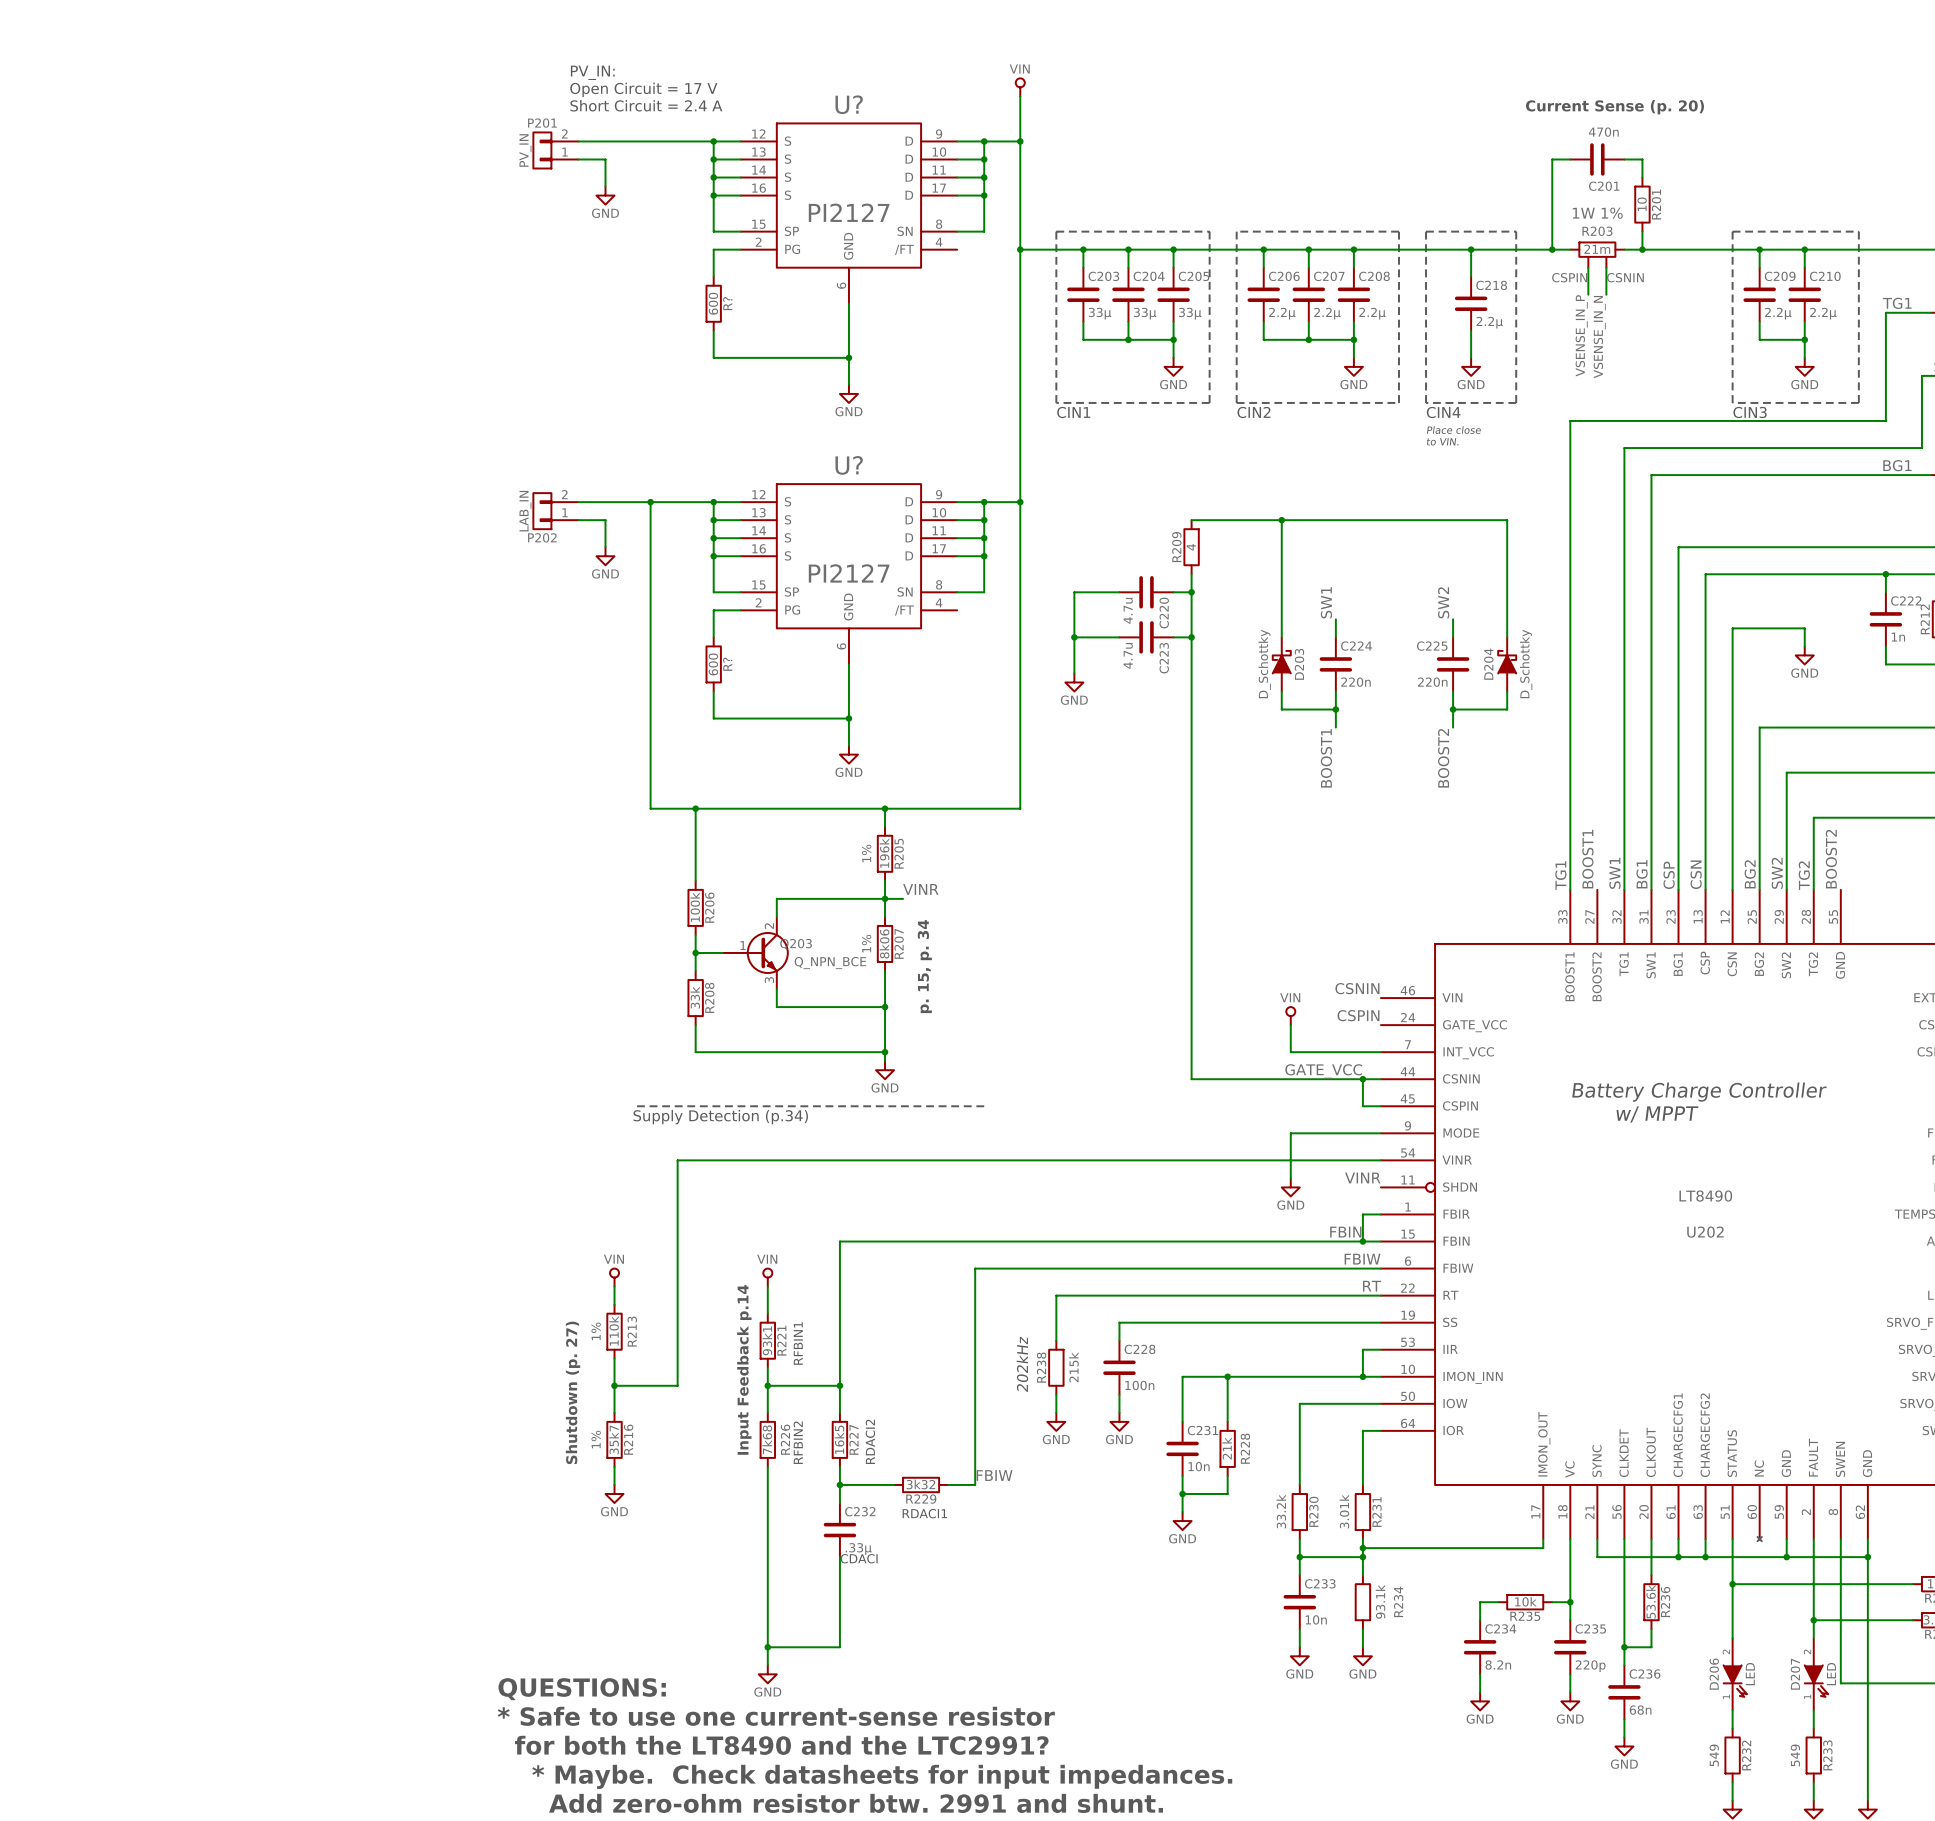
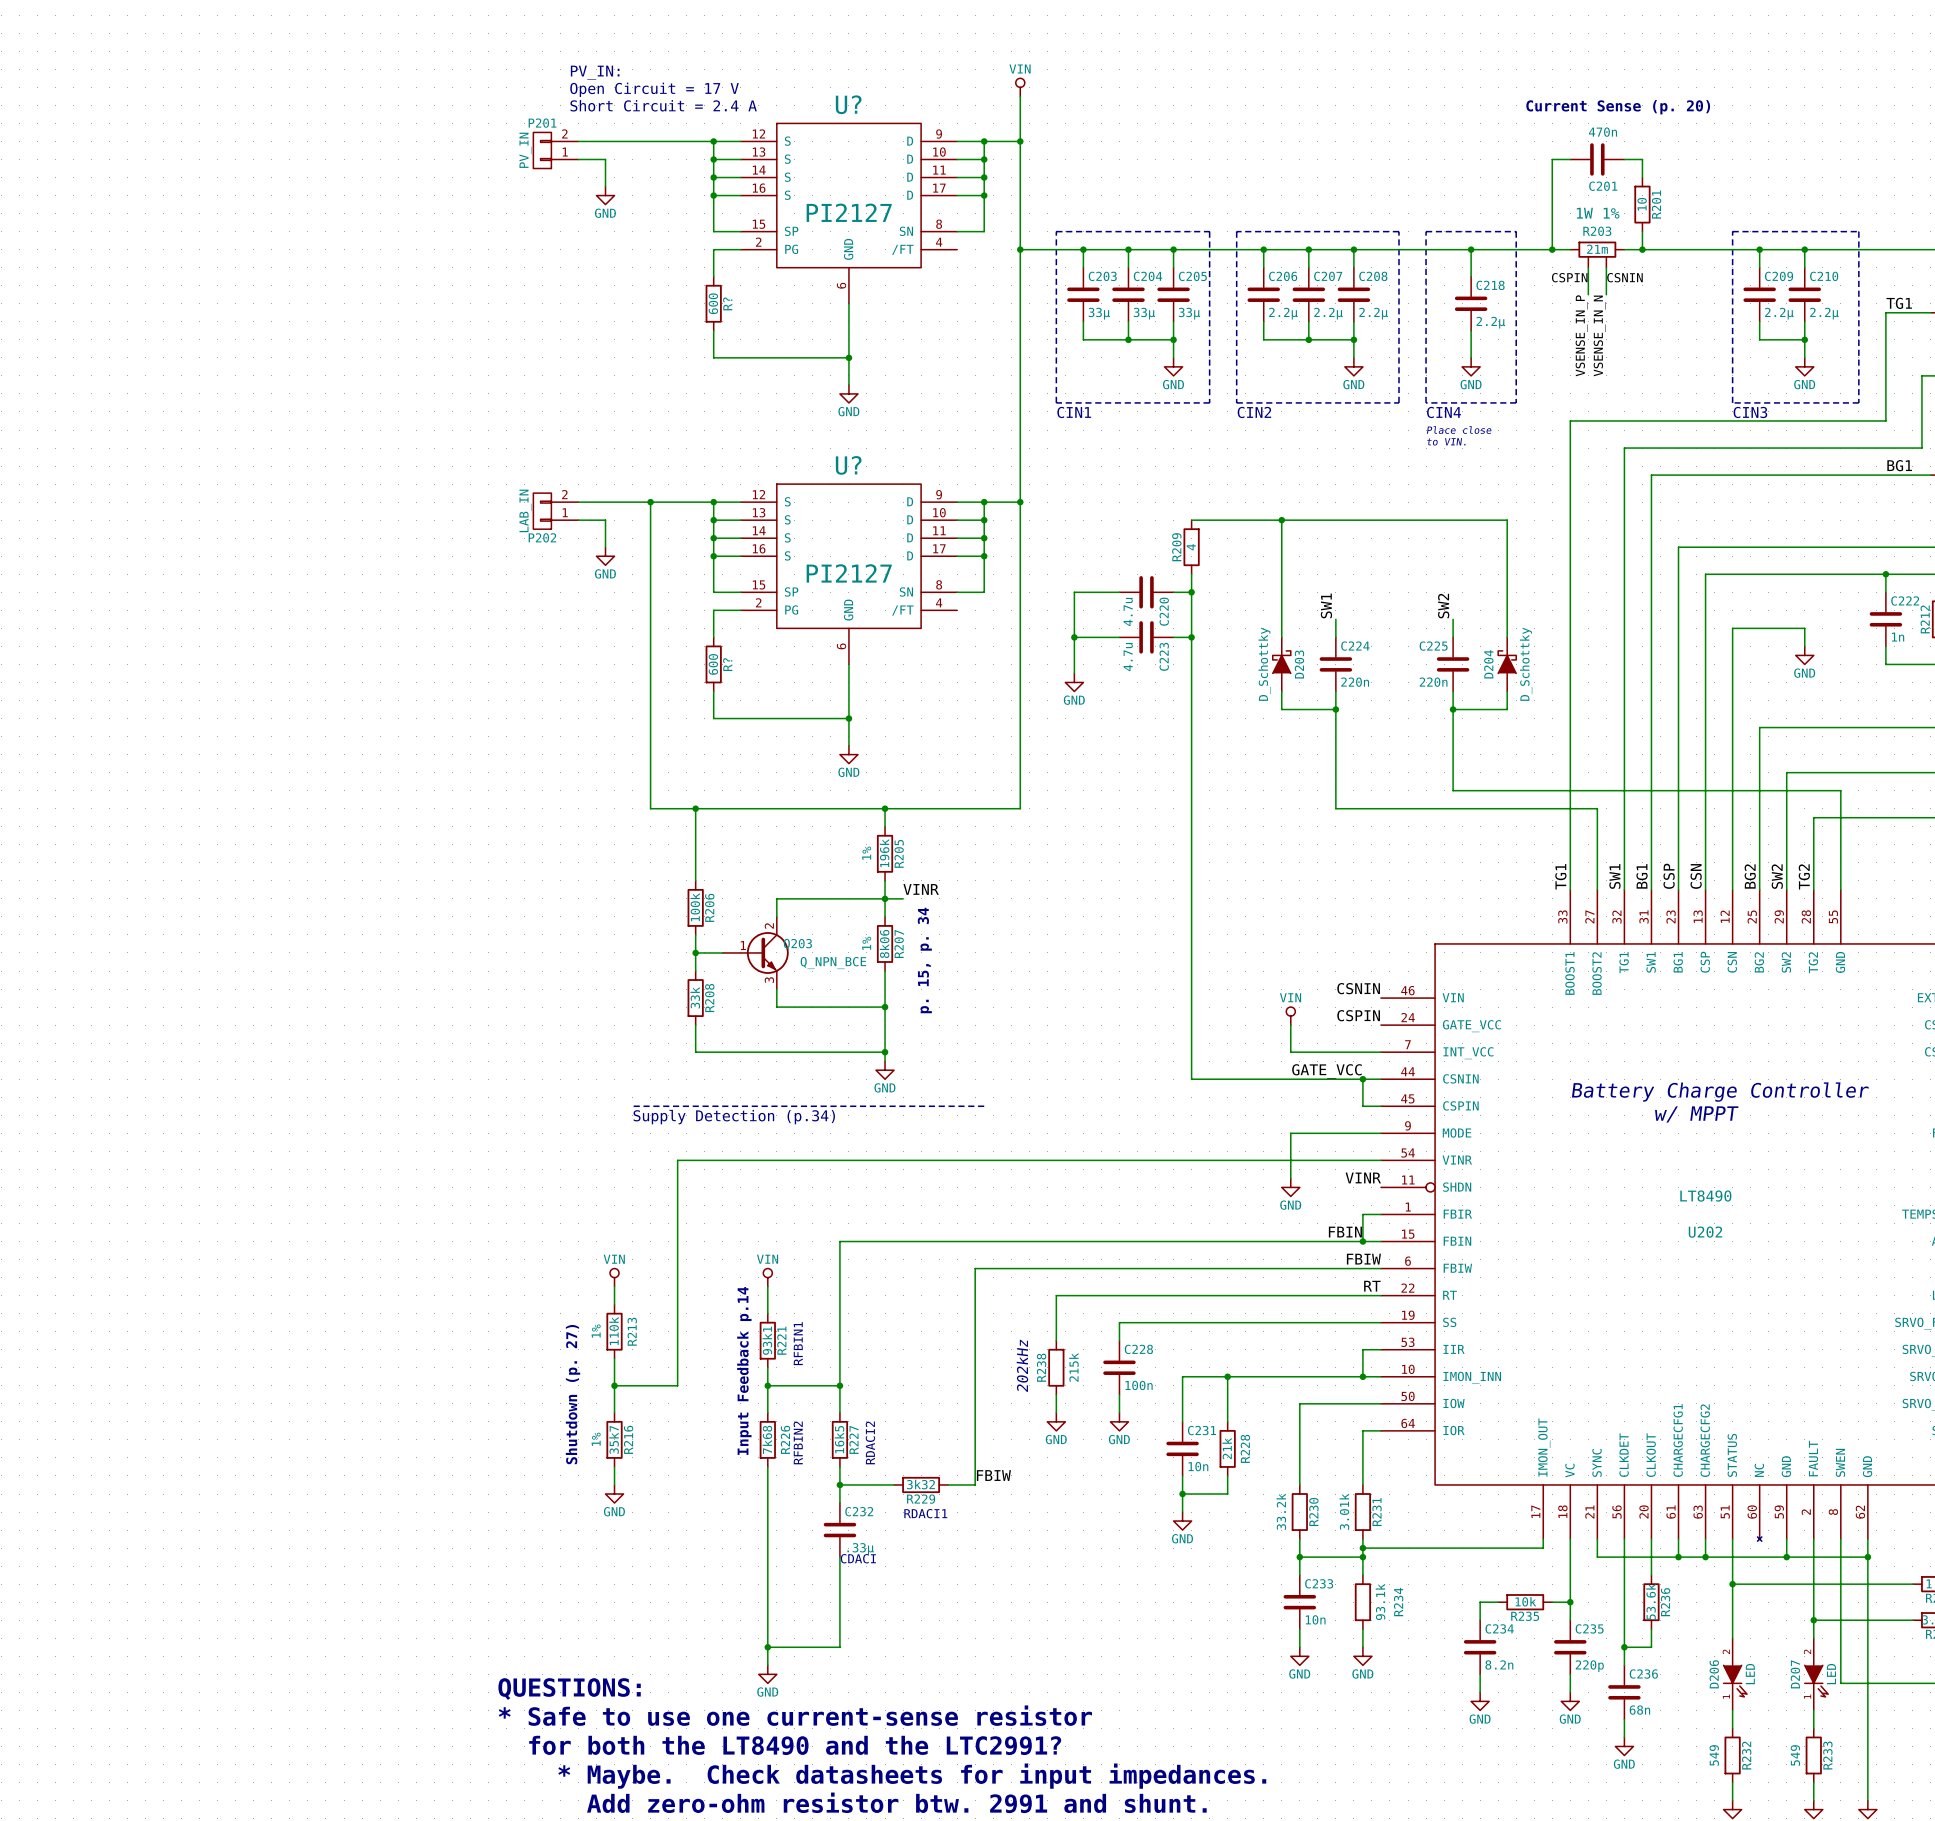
wire: none -> (1335, 727) (1335, 808) (1597, 808) (1597, 889)
wire: none -> (1453, 727) (1453, 790) (1840, 790) (1840, 889)
label: BOOST1 (1326, 758) -> none
label: BOOST2 (1443, 758) -> none
label: BOOST1 (1587, 859) -> none
label: BOOST2 (1831, 859) -> none

